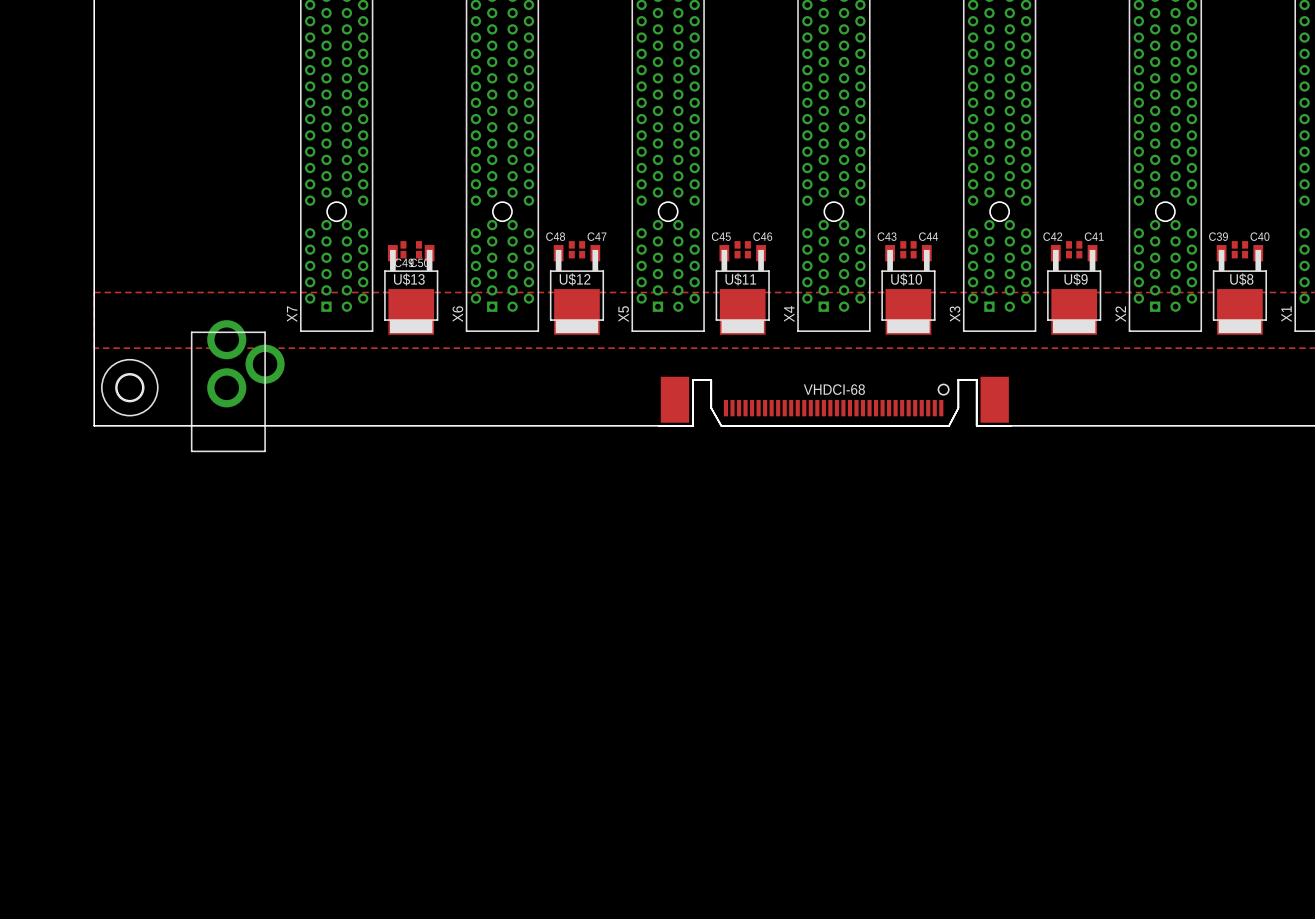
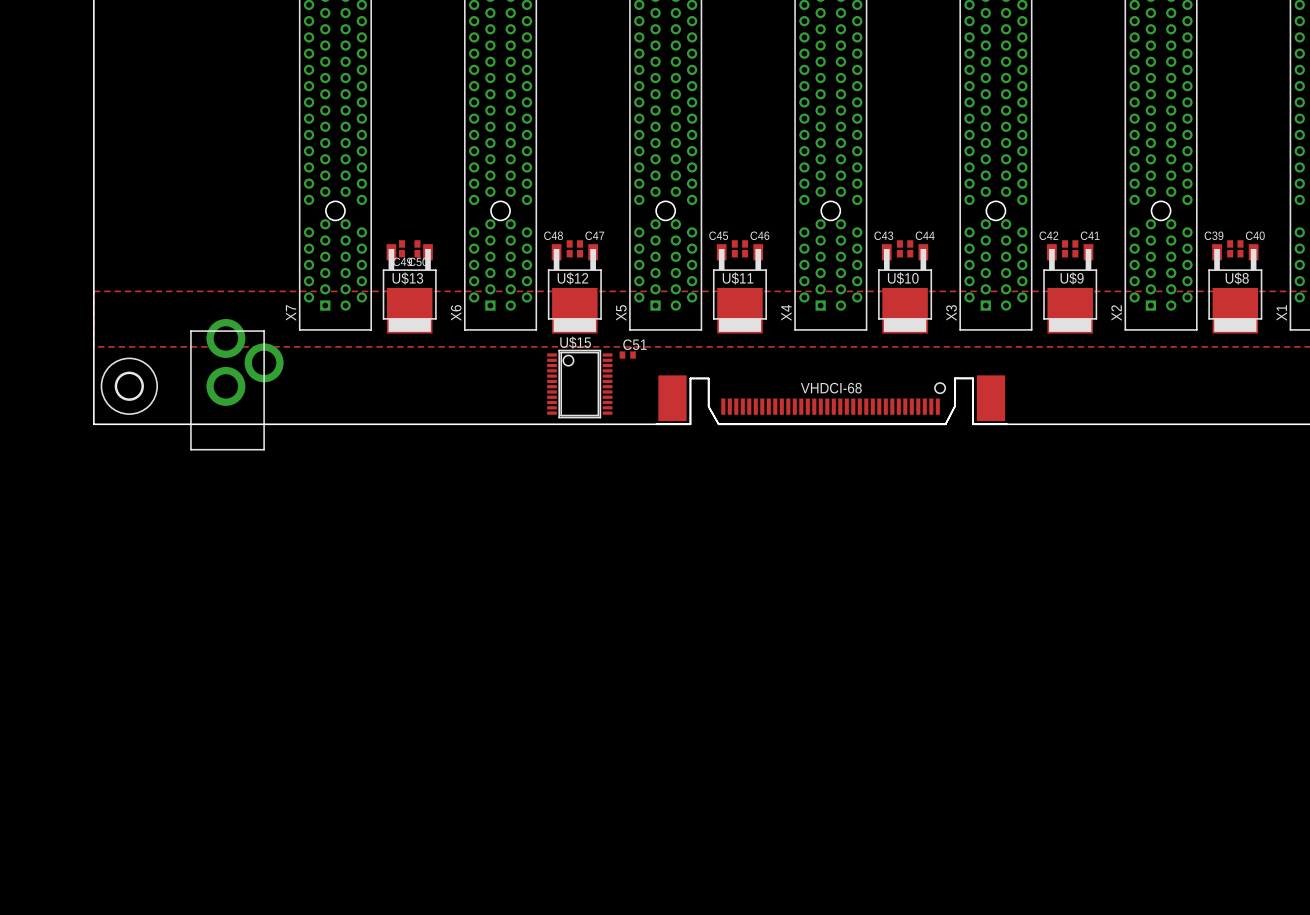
C51: none -> (627, 355)
U$15: none -> (579, 384)

